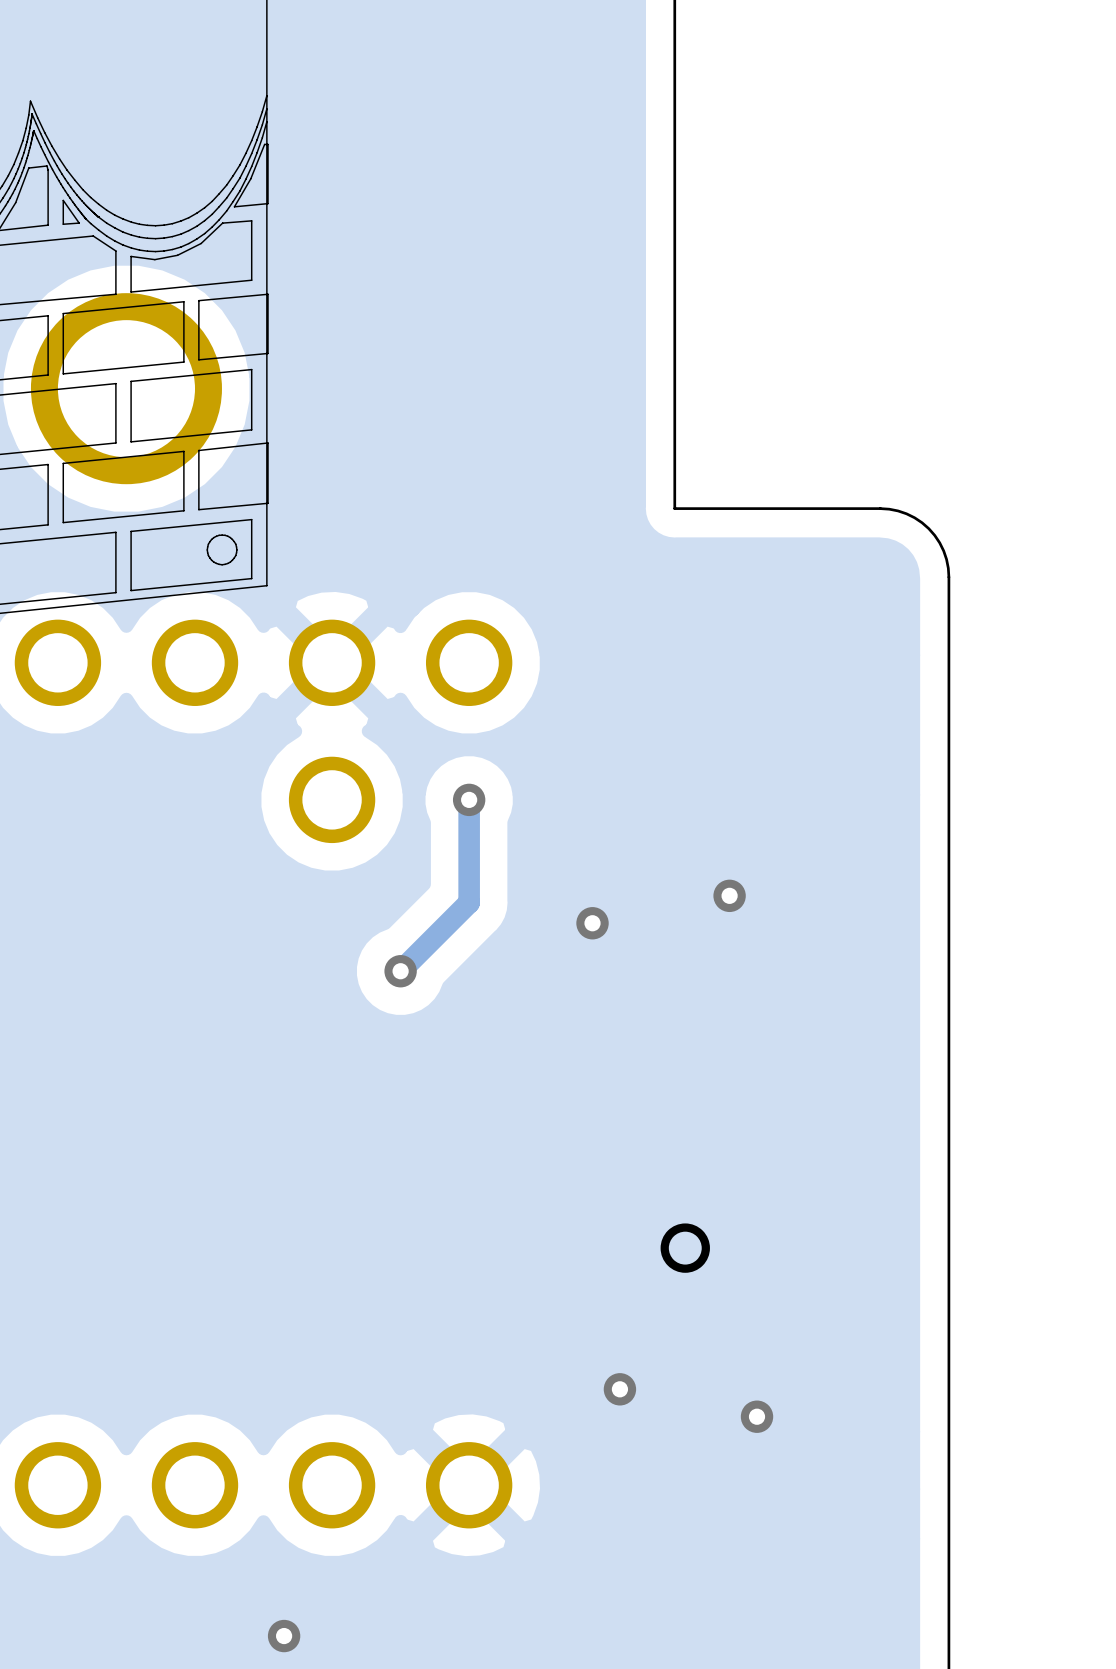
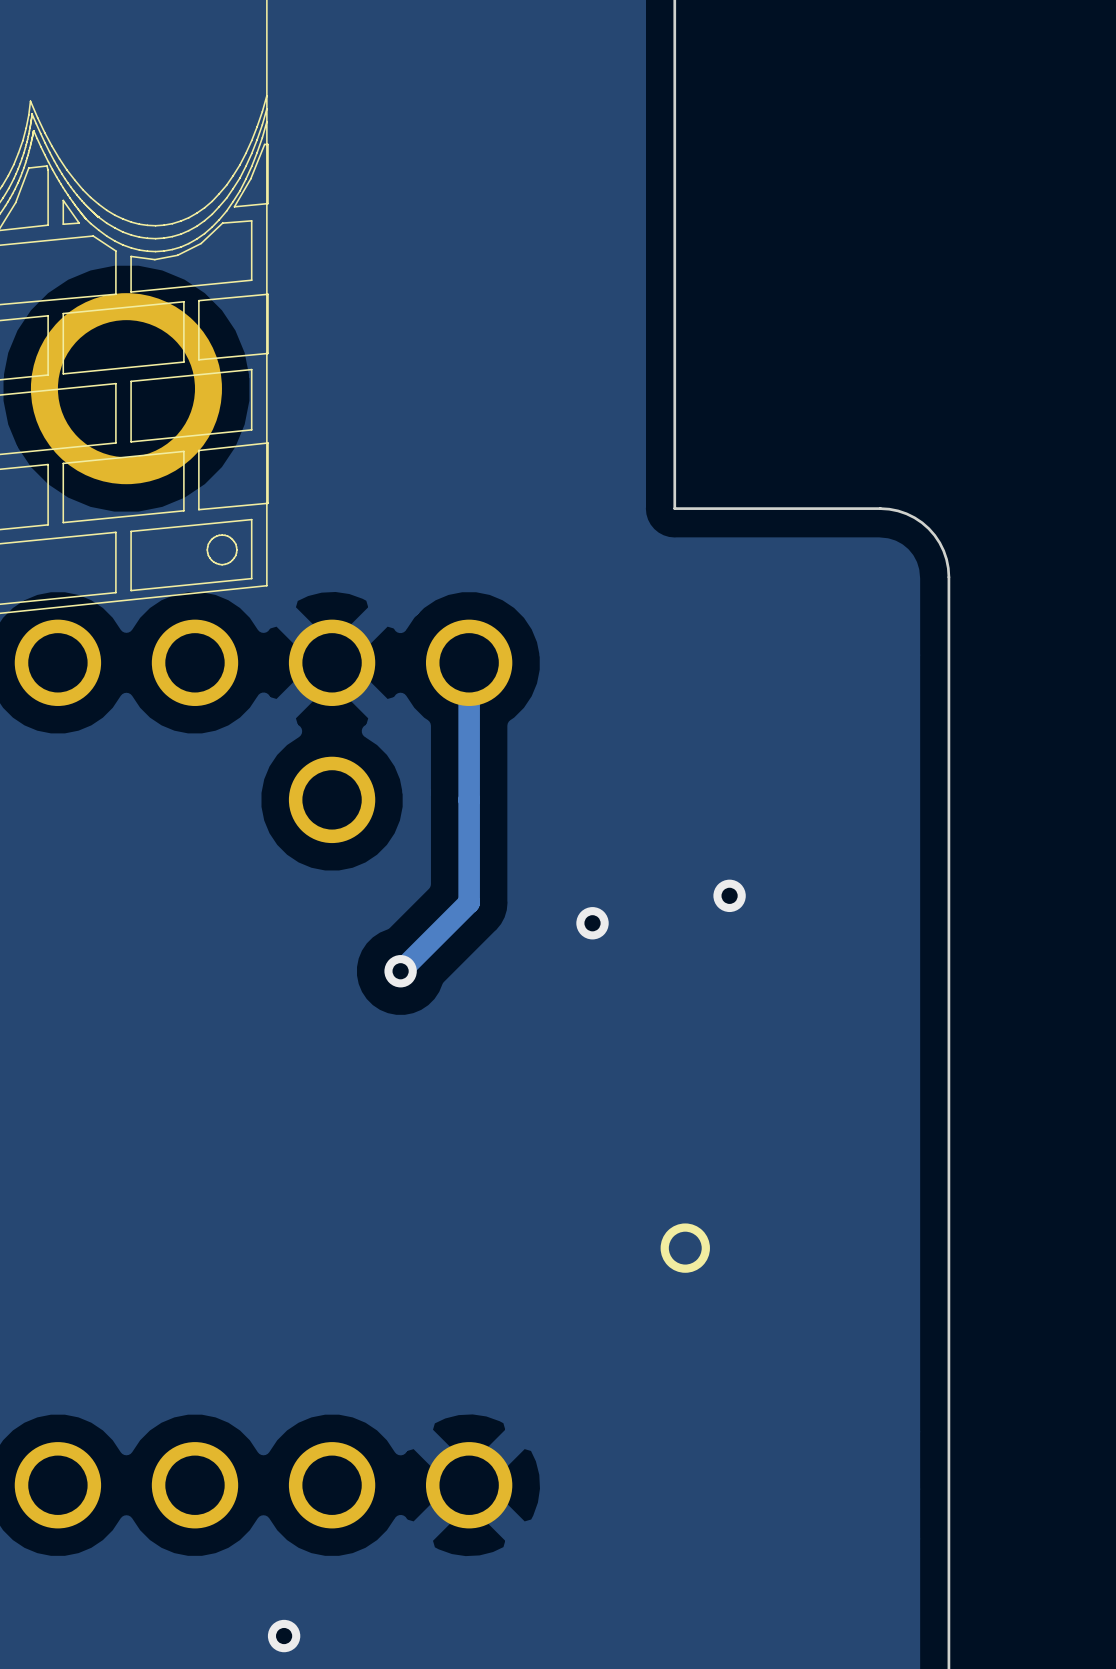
track: none -> (469, 662) (469, 799)
via: (469, 799) -> none
via: (619, 1389) -> none
via: (757, 1416) -> none

